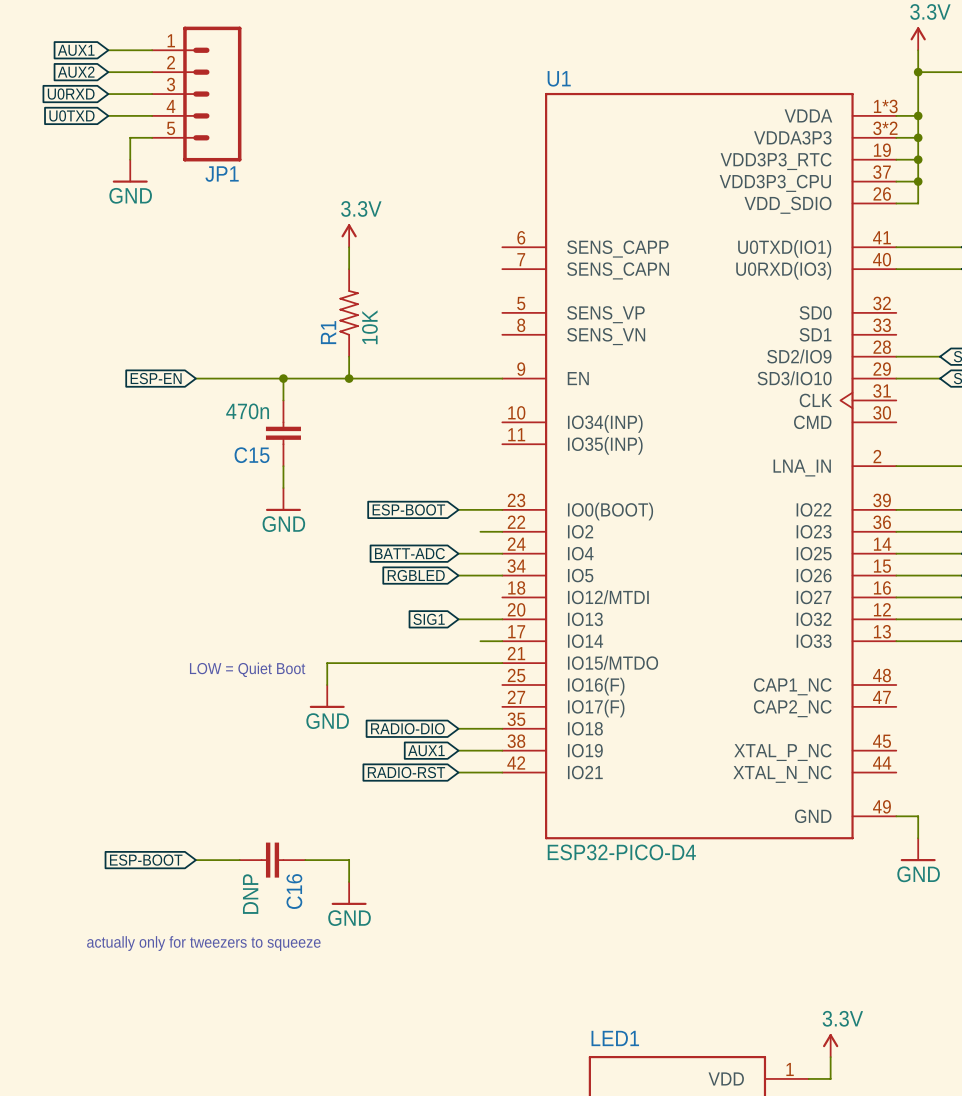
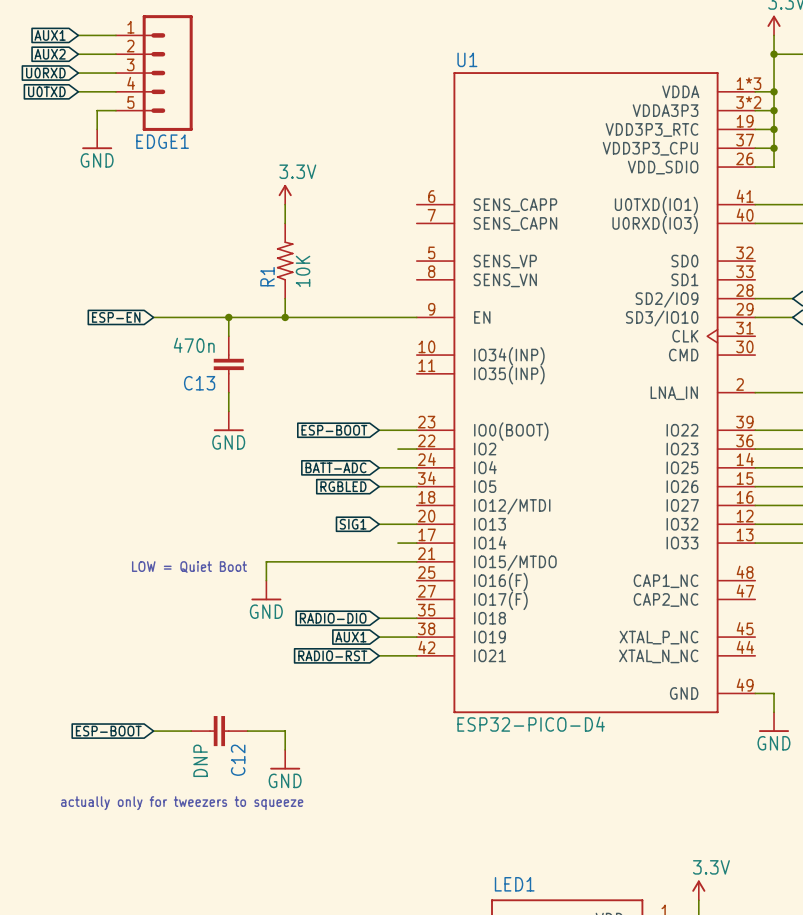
JP1 name: JP1 (222, 174) -> EDGE1 (162, 141)
C15 name: C15 (252, 455) -> C13 (199, 383)
C16 name: C16 (294, 891) -> C12 (238, 760)

